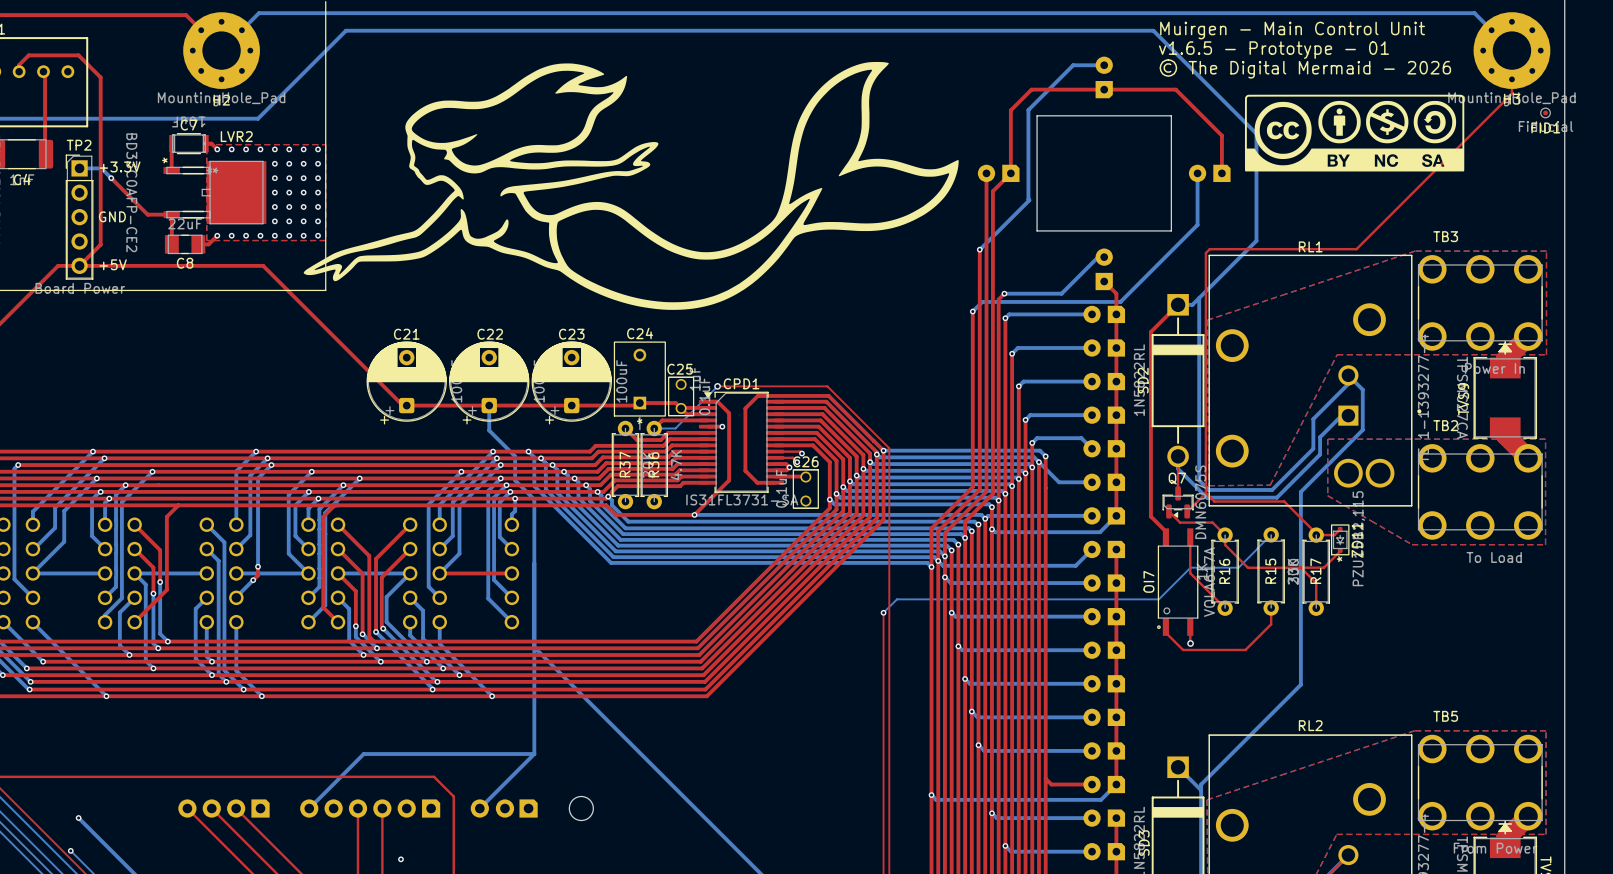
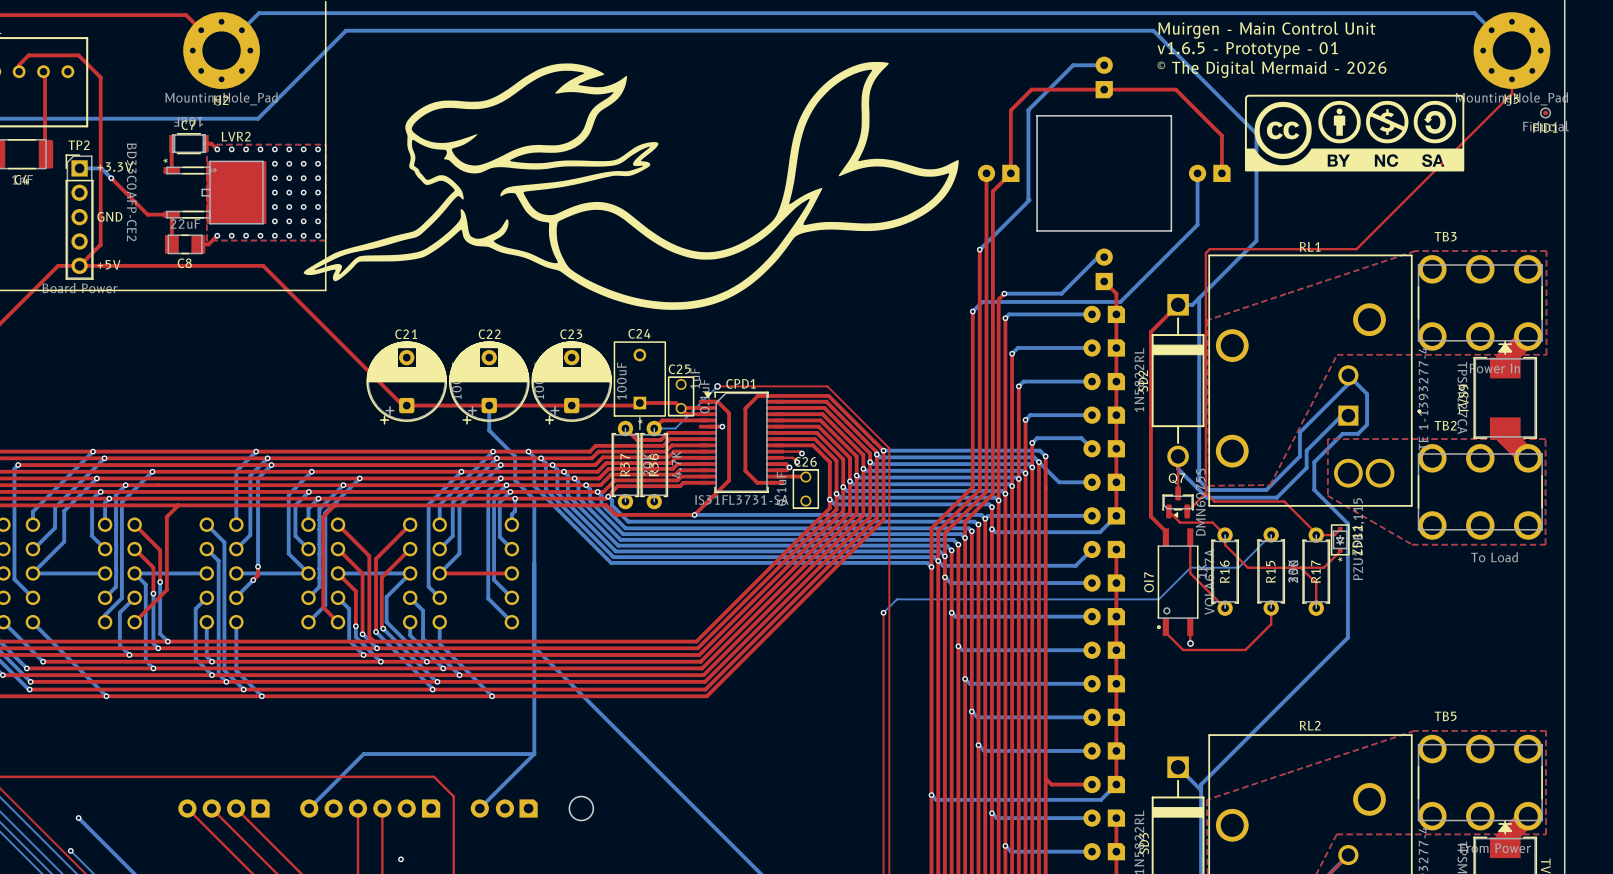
bottom track: (1362, 389) (1362, 430) (1300, 491) (1300, 684) -> (1362, 389) (1367, 394) (1367, 424) (1357, 433) (1342, 433) (1314, 462) (1314, 489) (1347, 523) (1347, 637) (1300, 684)
bottom track: (1313, 418) (1313, 448) (1272, 489) (1266, 489) -> (1313, 418) (1299, 432) (1299, 456) (1266, 489)
bottom track: (1320, 437) (1320, 454) (1306, 467) -> (1320, 437) (1306, 450) (1306, 467)

